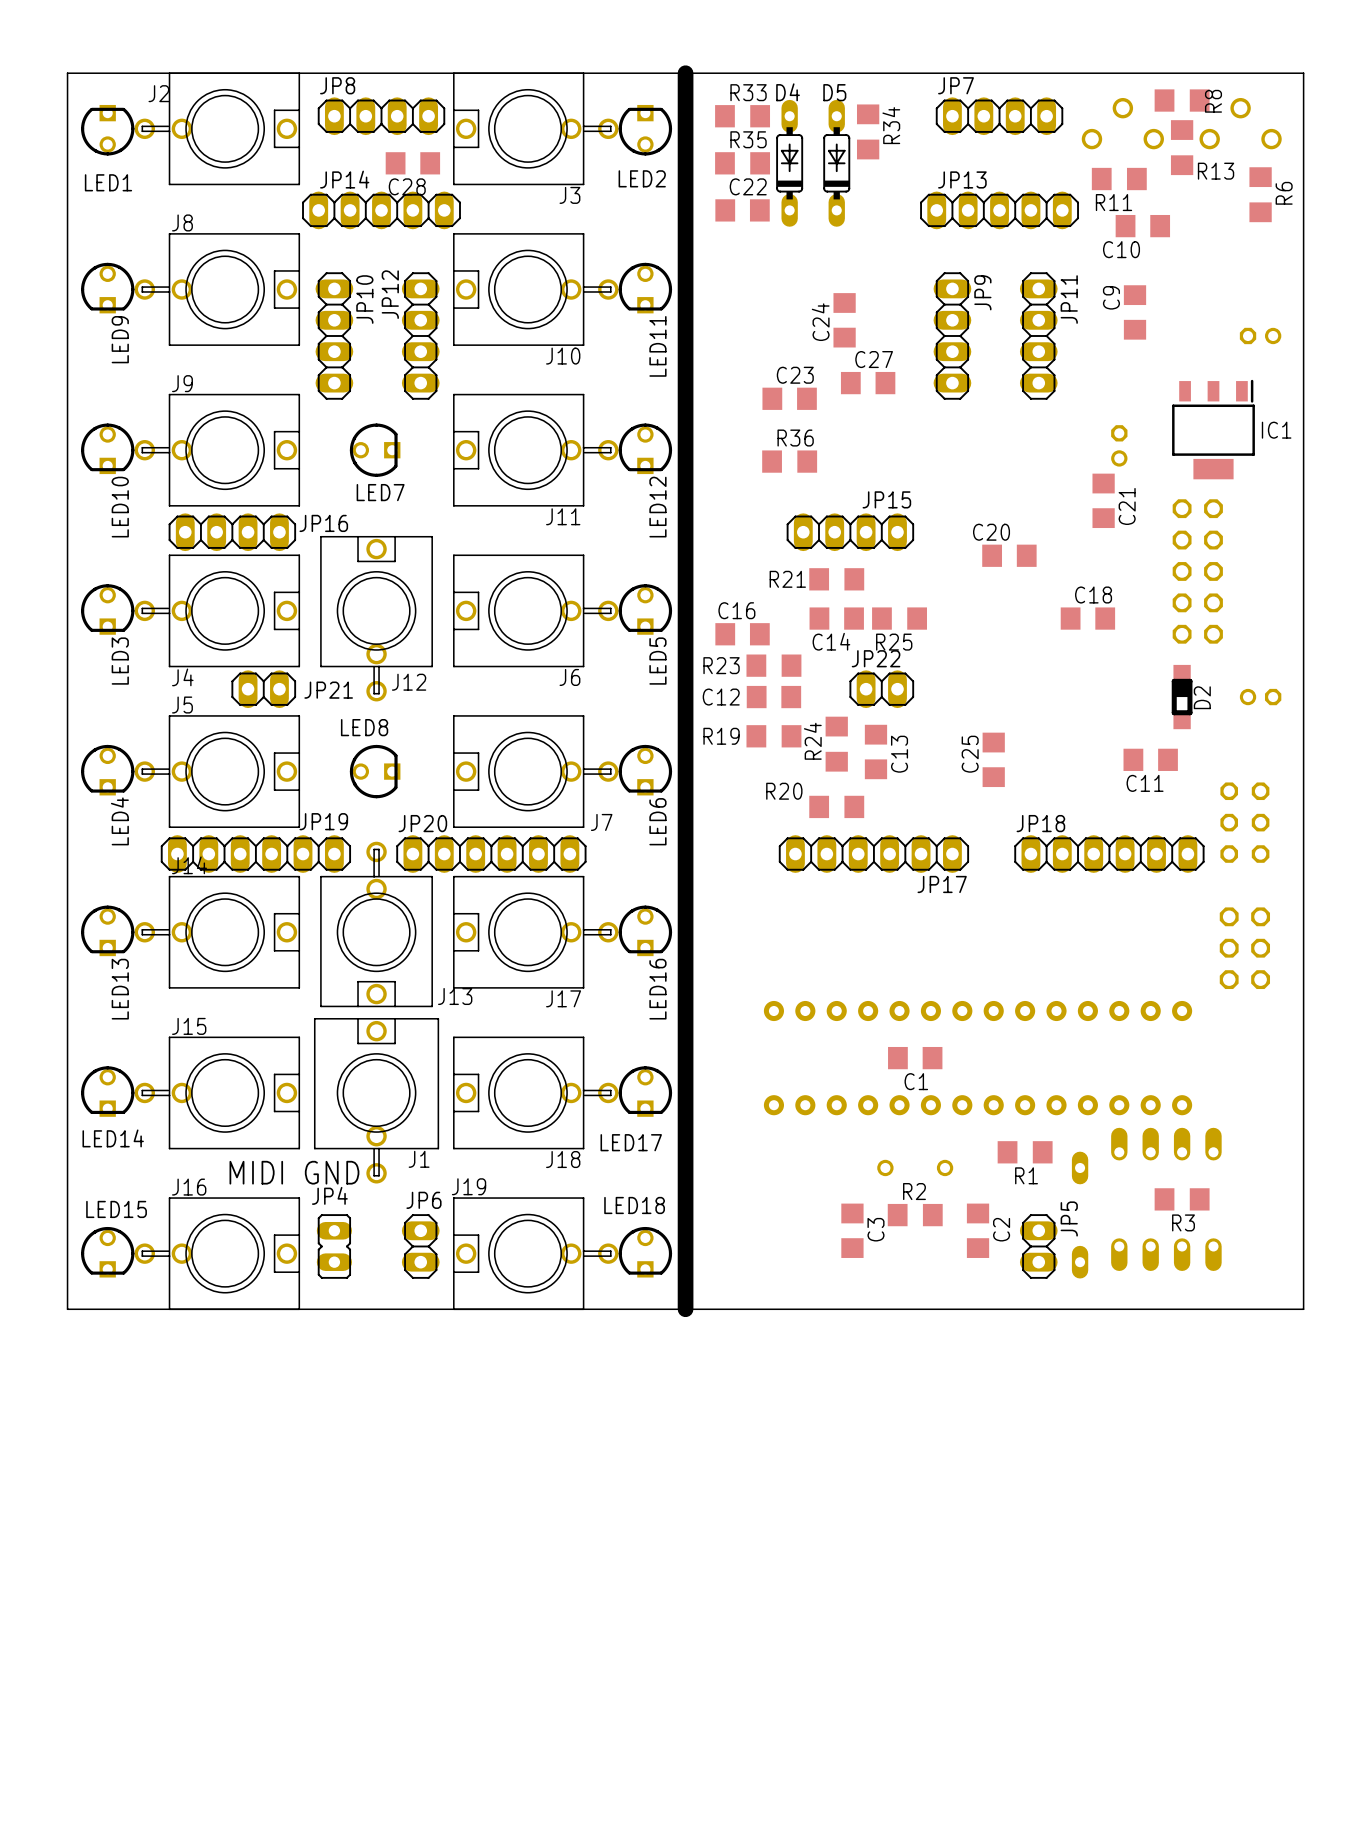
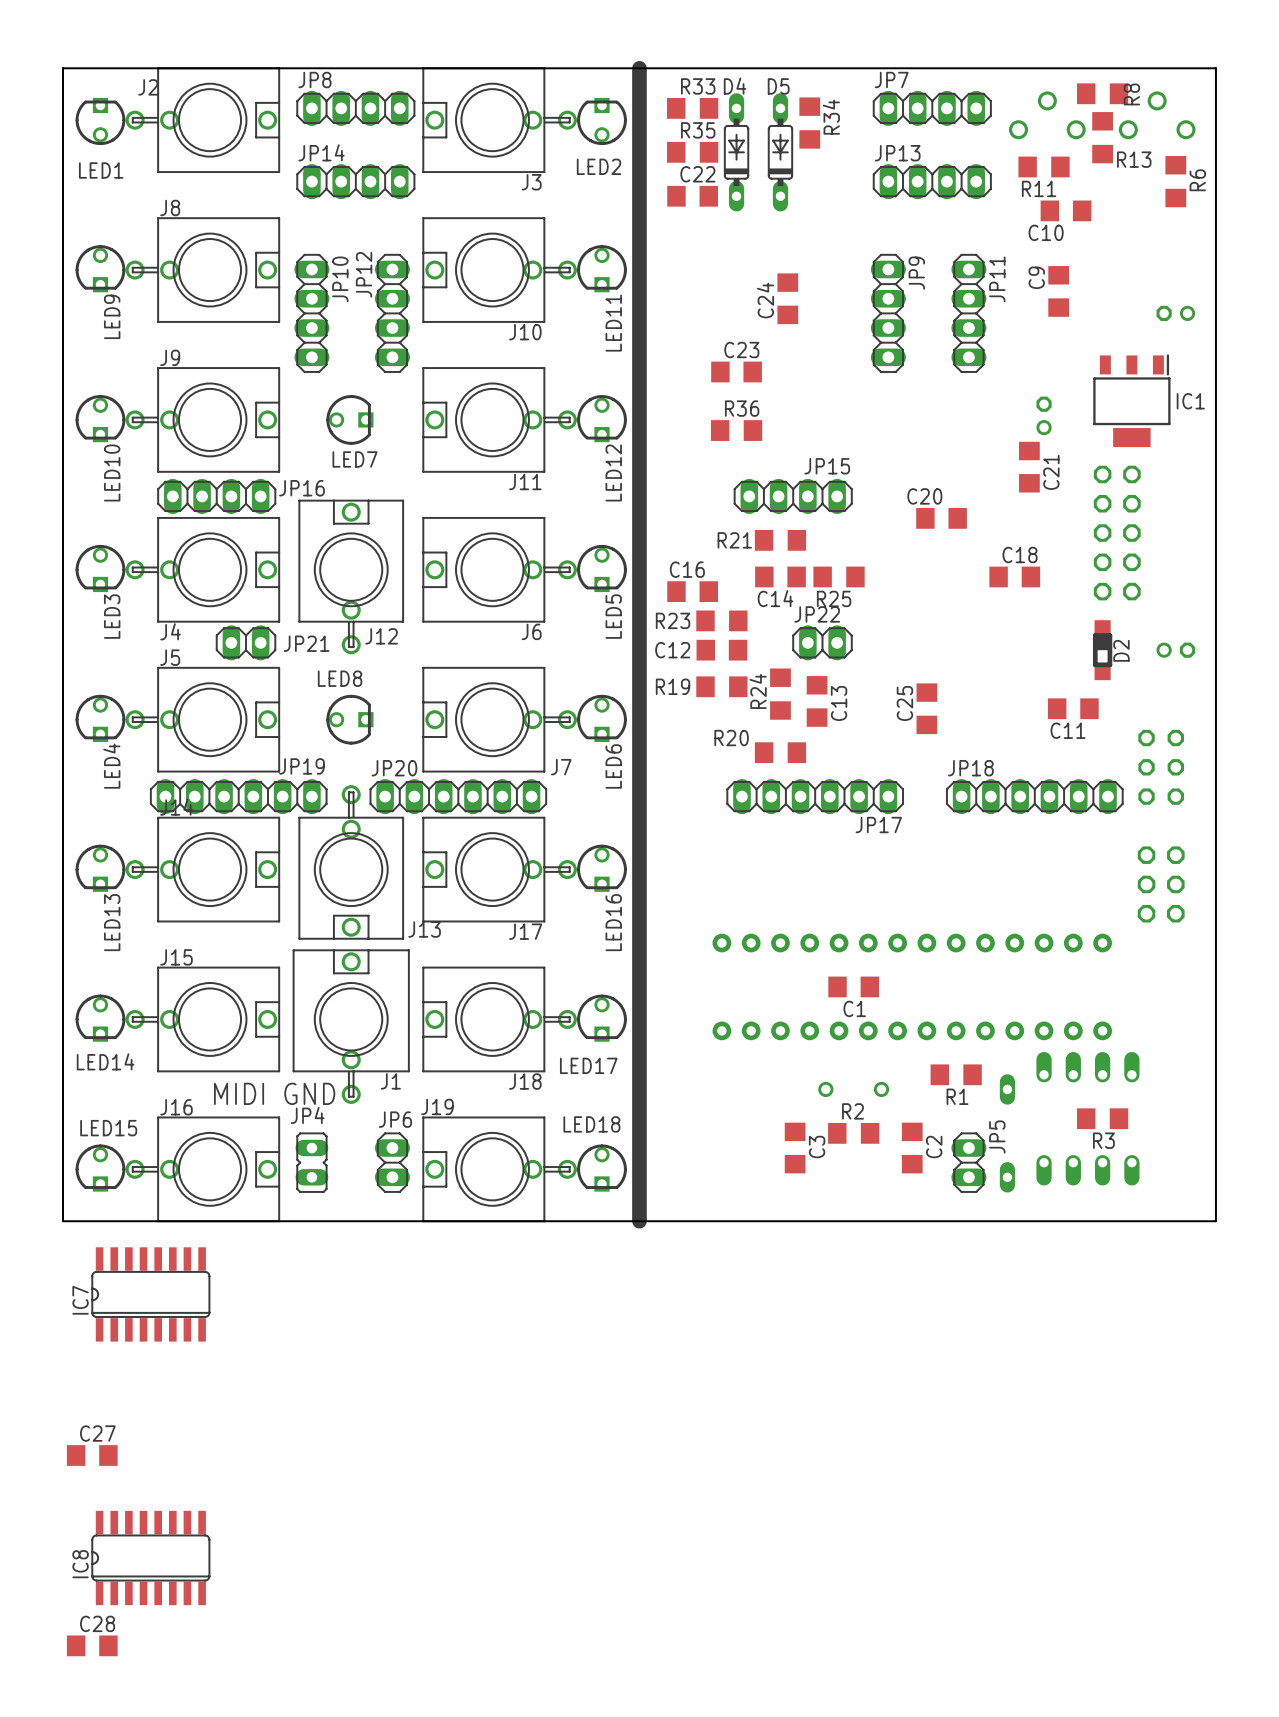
C28 position: (412, 163) -> (92, 1645)
C28 name position: C28 (407, 186) -> C28 (97, 1623)
JP14 footprint: [302, 191, 461, 230] -> [296, 164, 416, 200]
JP13 footprint: [920, 191, 1079, 230] -> [872, 164, 992, 200]
C27 position: (868, 383) -> (92, 1455)
IC7: none -> (150, 1294)
IC8: none -> (150, 1558)

